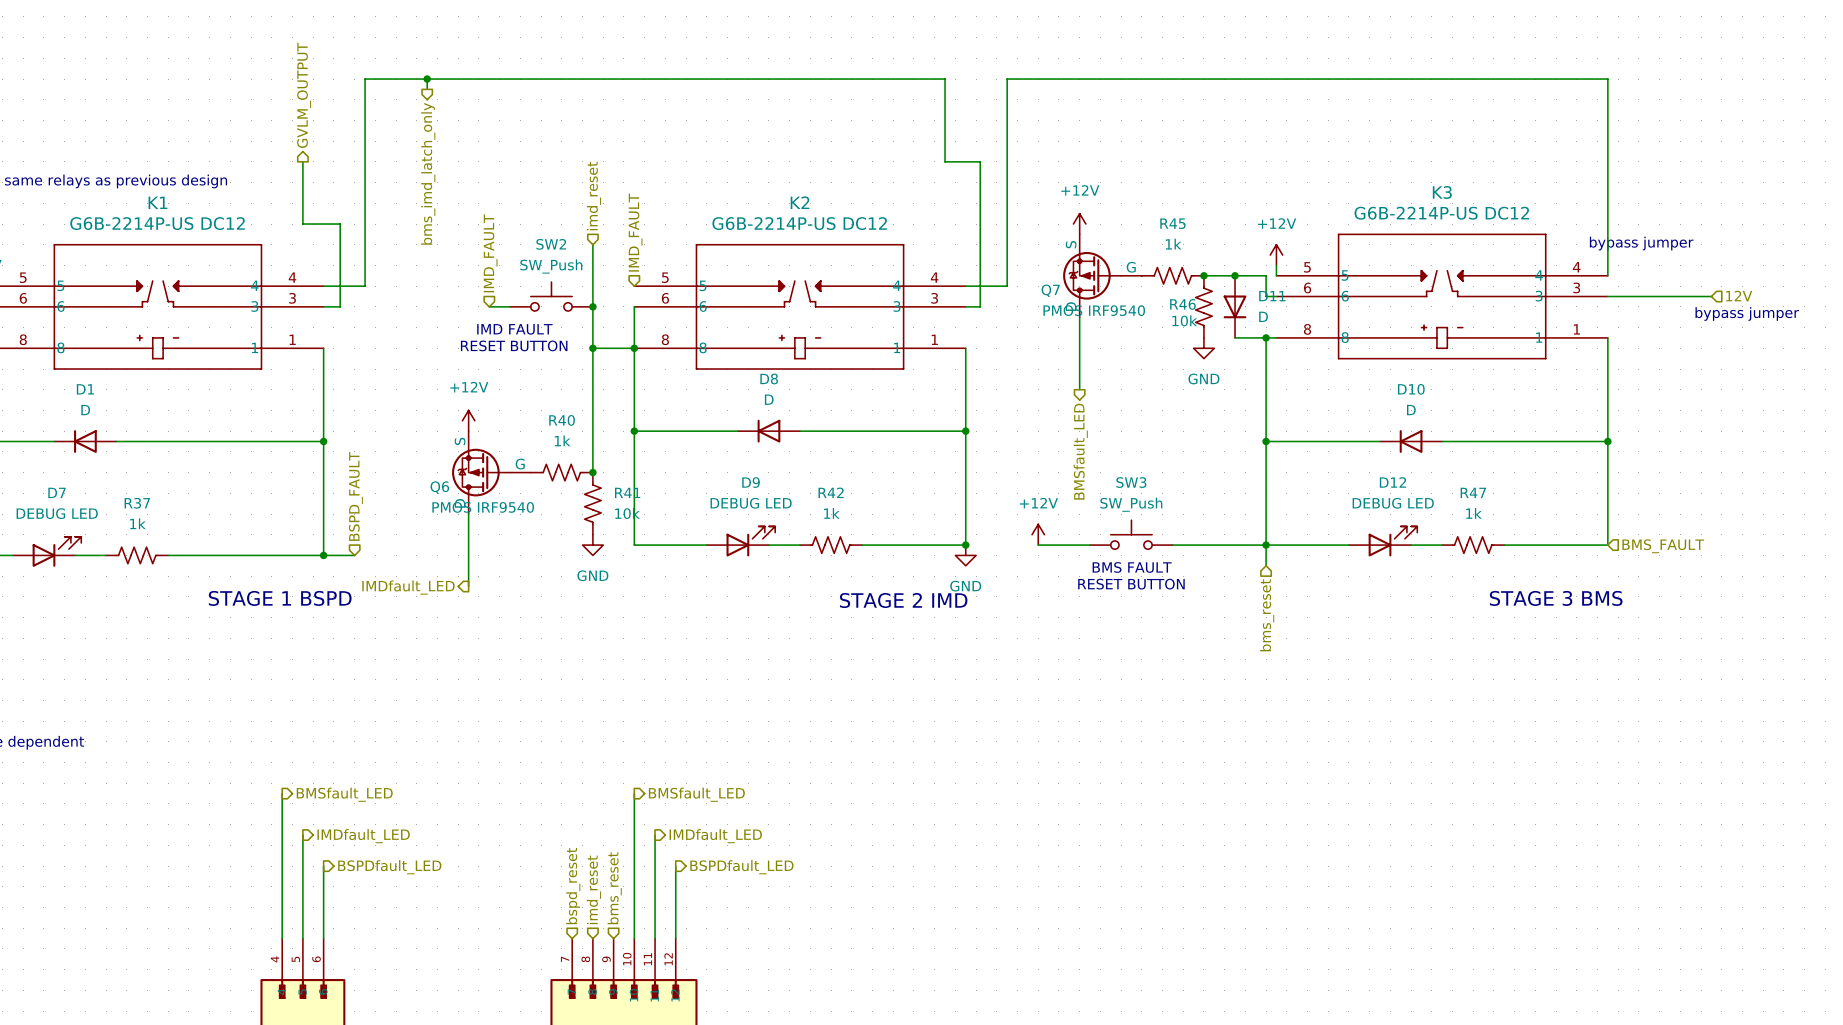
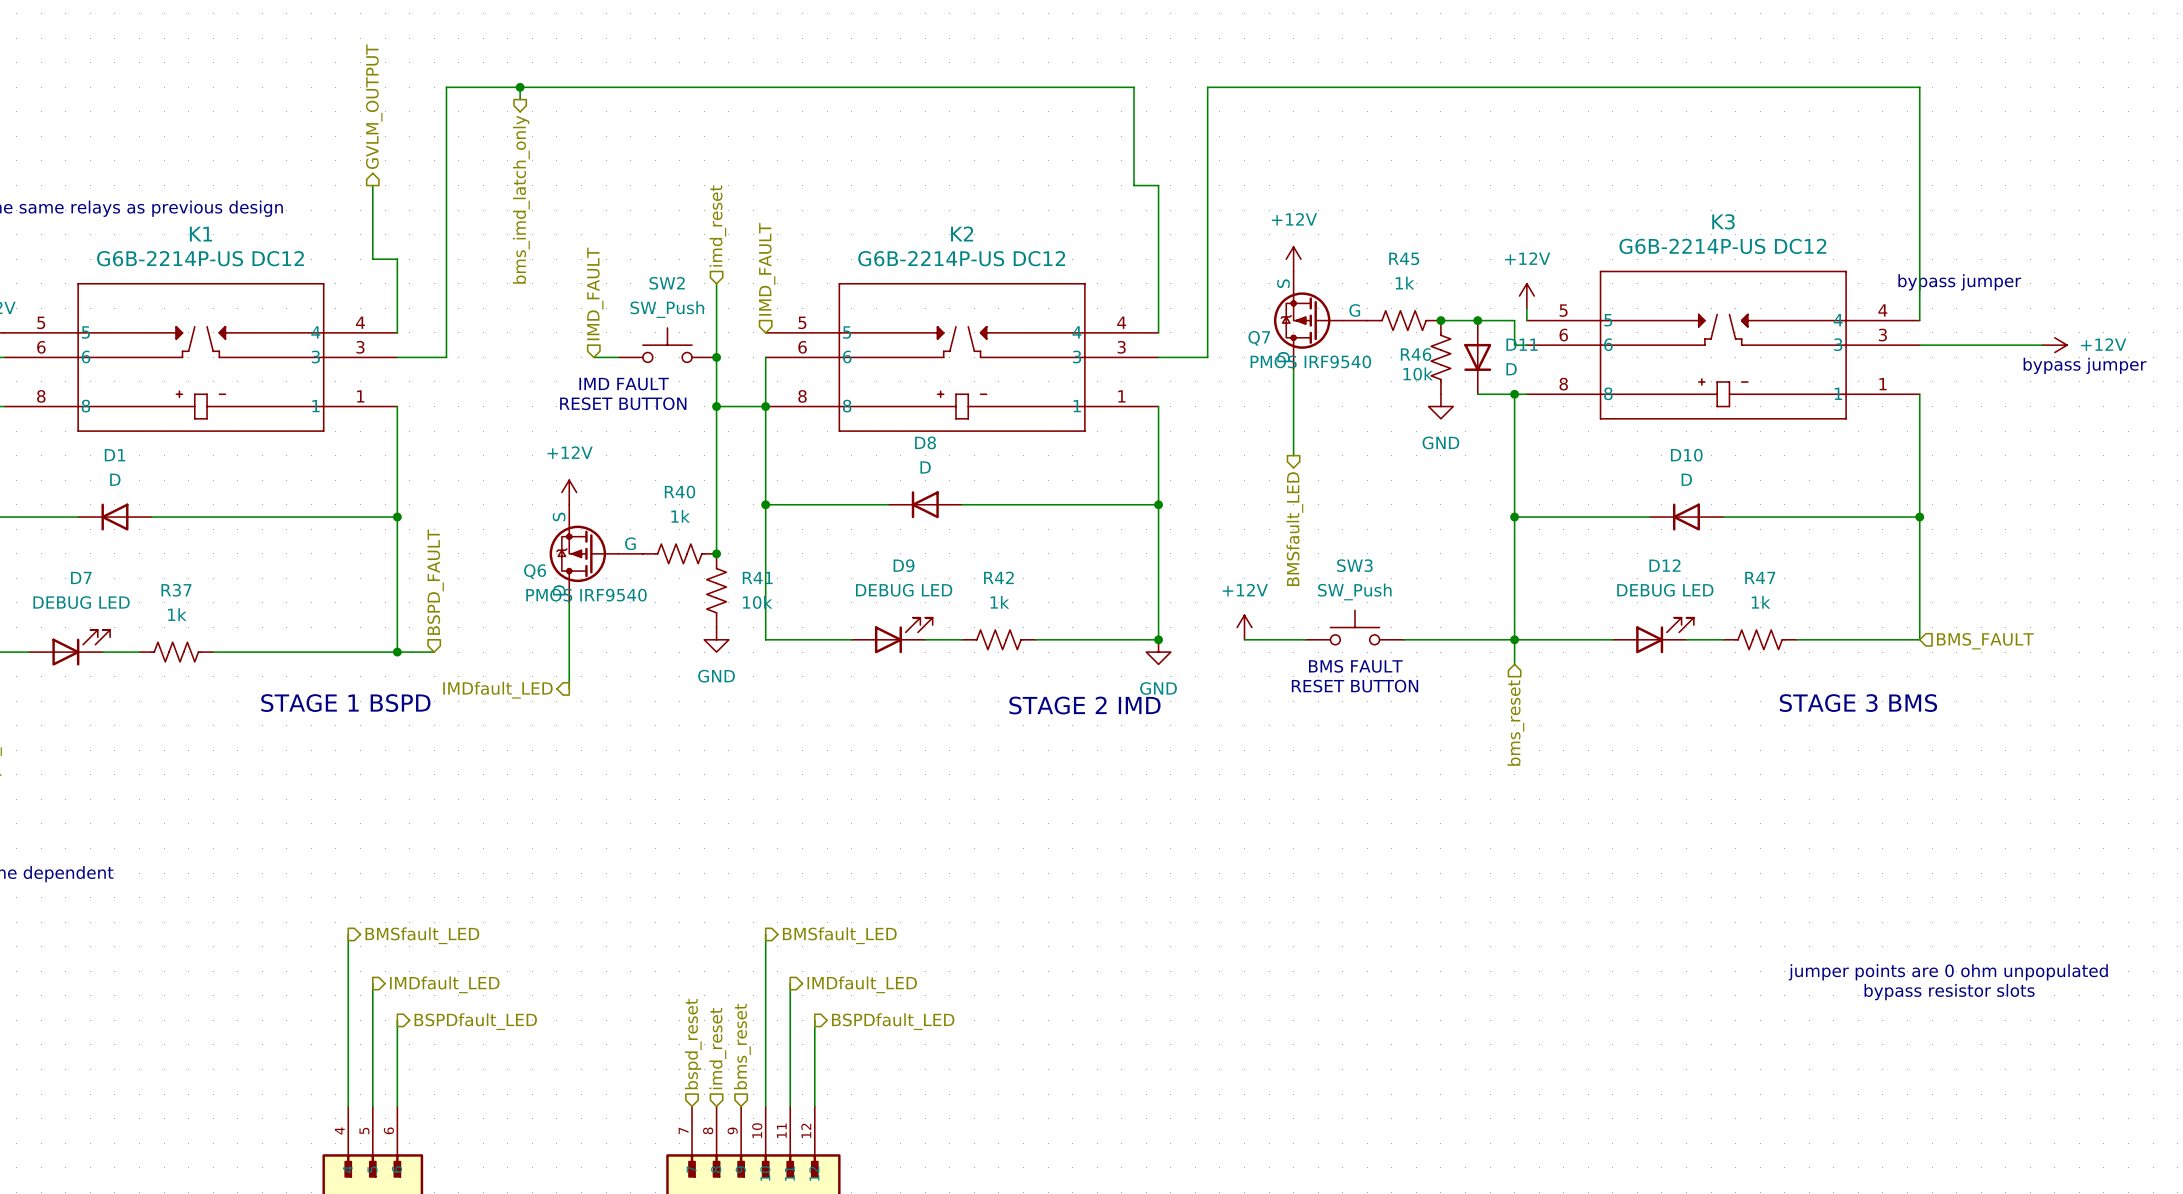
wire: (965, 161) (980, 161) (980, 306) -> (1158, 185) (1158, 332)
wire: (323, 224) (340, 224) (340, 306) -> (397, 259) (397, 332)
wire: (323, 286) (365, 286) -> (417, 357) (446, 357) (446, 332)
wire: (965, 286) (1007, 286) -> (1175, 357) (1207, 357) (1207, 332)
power symbol: none -> +12V (2054, 345)
hierarchical label: 12V (1739, 296) -> none
text: none -> jumper points are 0 ohm unpopulated (1948, 972)
text: none -> bypass resistor slots (1949, 992)

